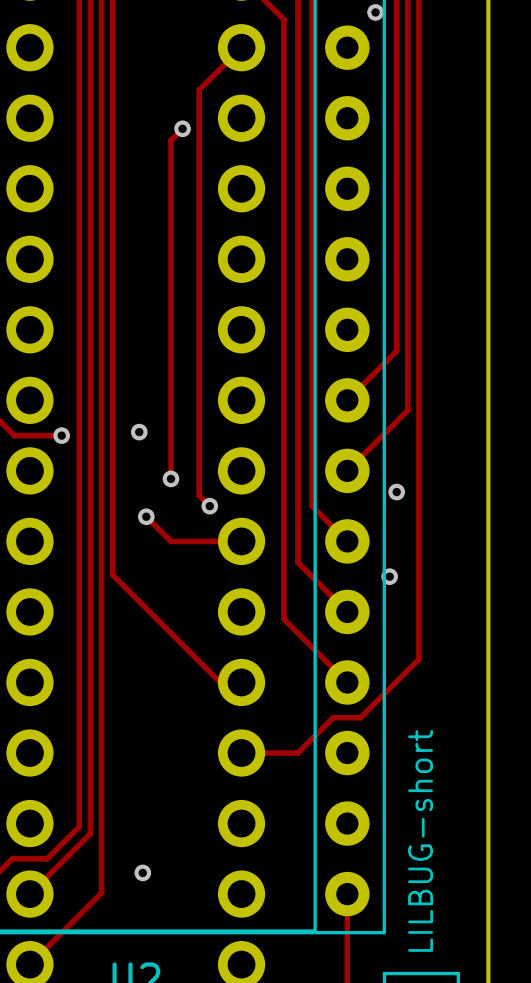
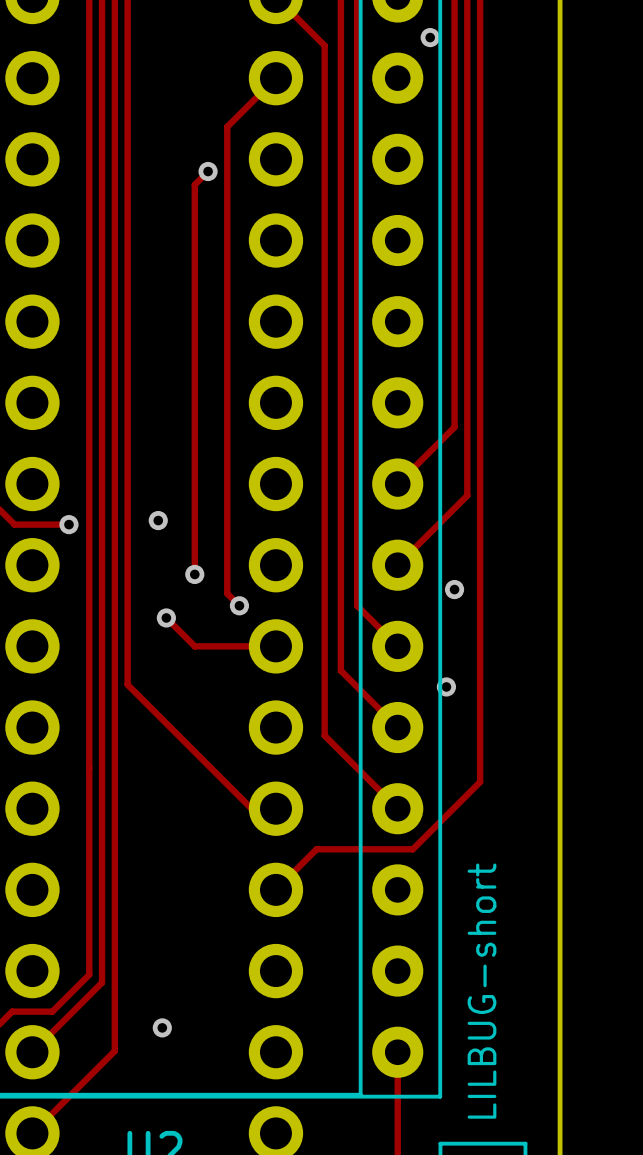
track: (333, 717) (297, 753) (241, 753) -> (381, 849) (316, 849) (275, 889)

